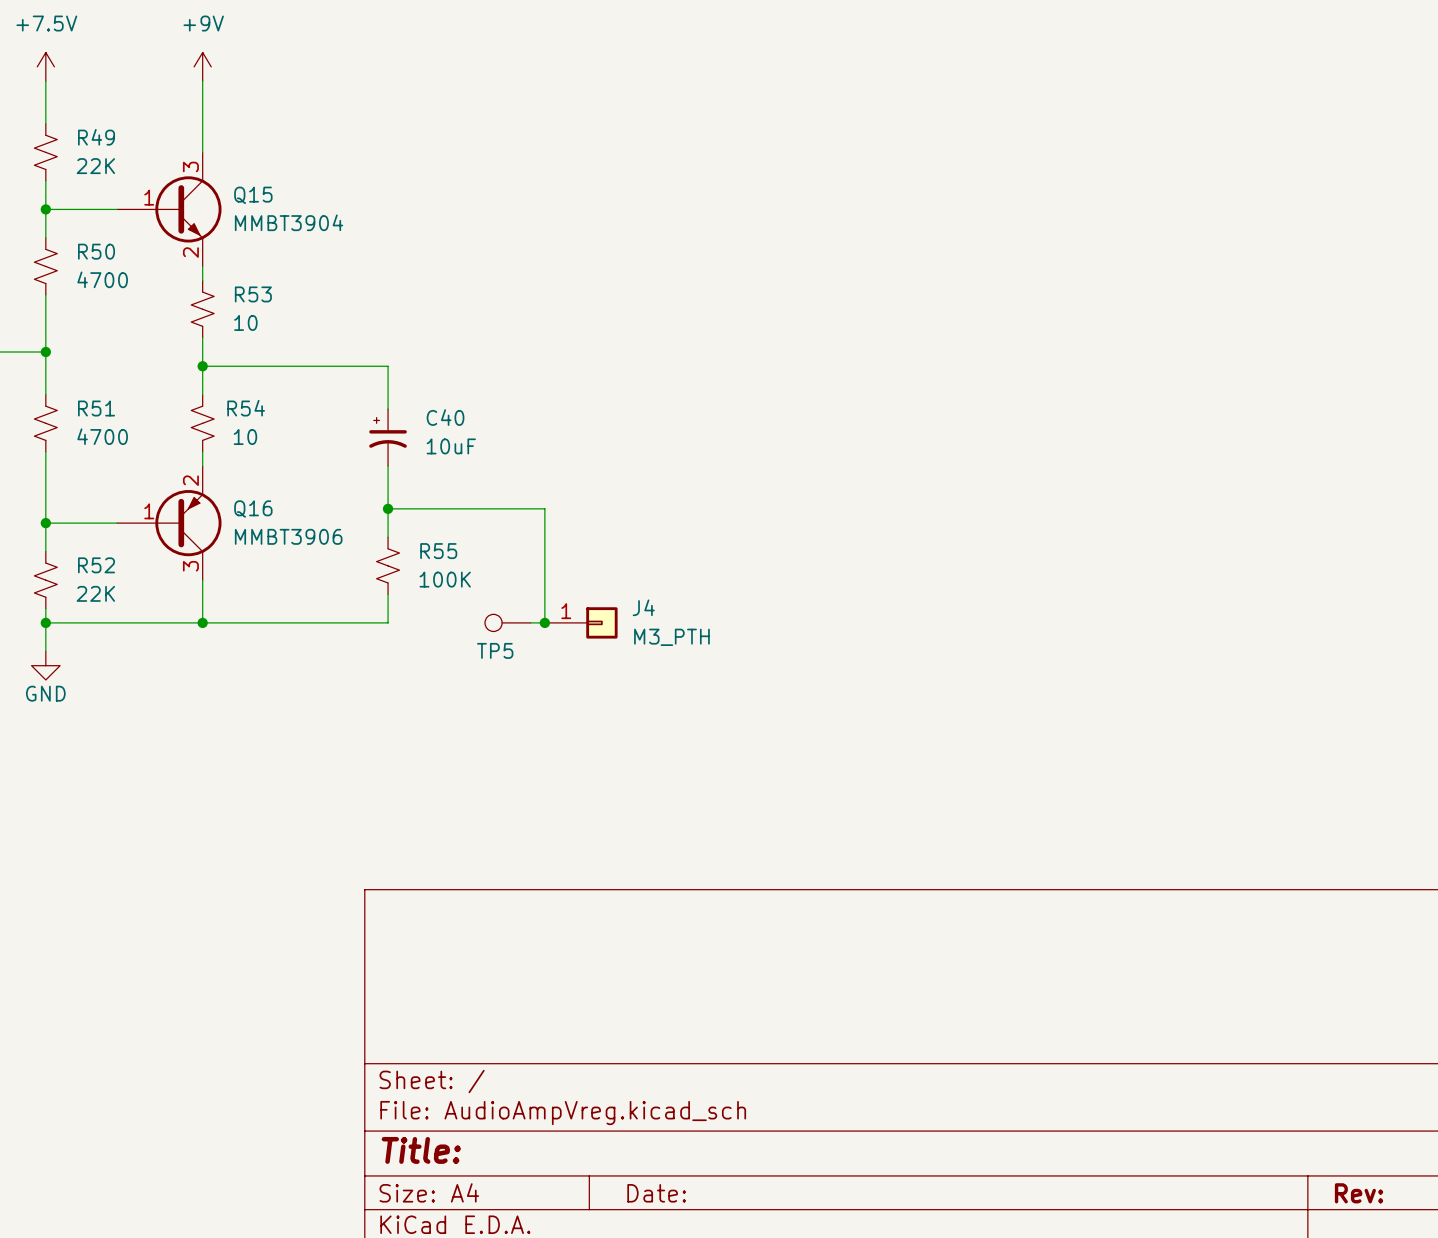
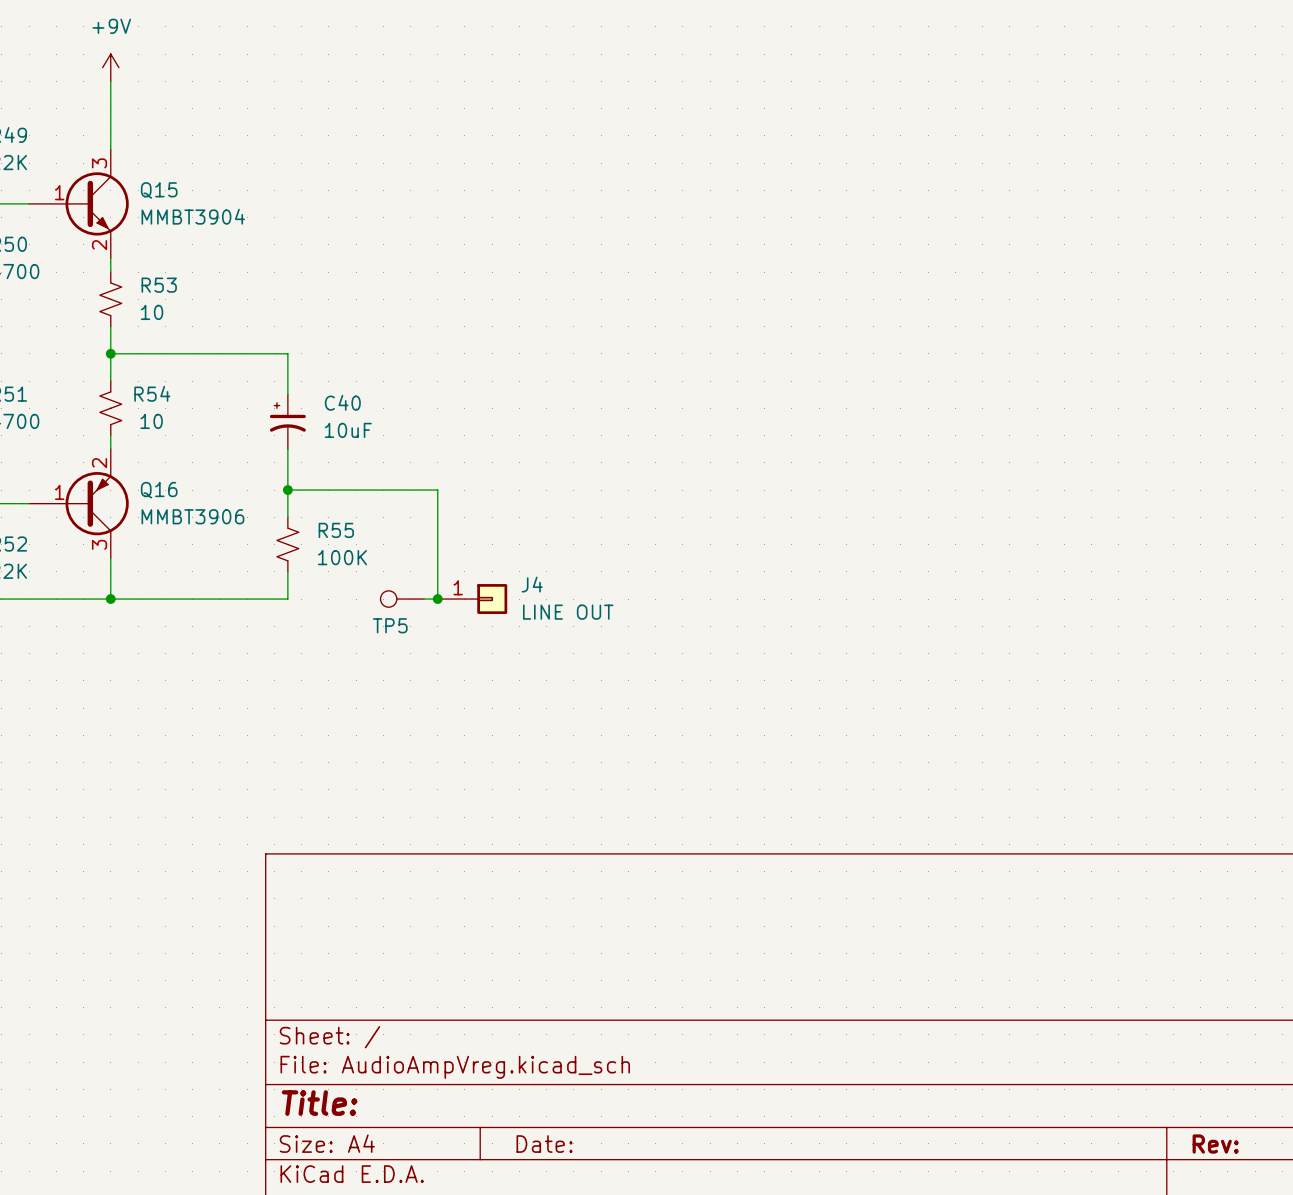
J4 value: M3_PTH (671, 637) -> LINE OUT (568, 612)

